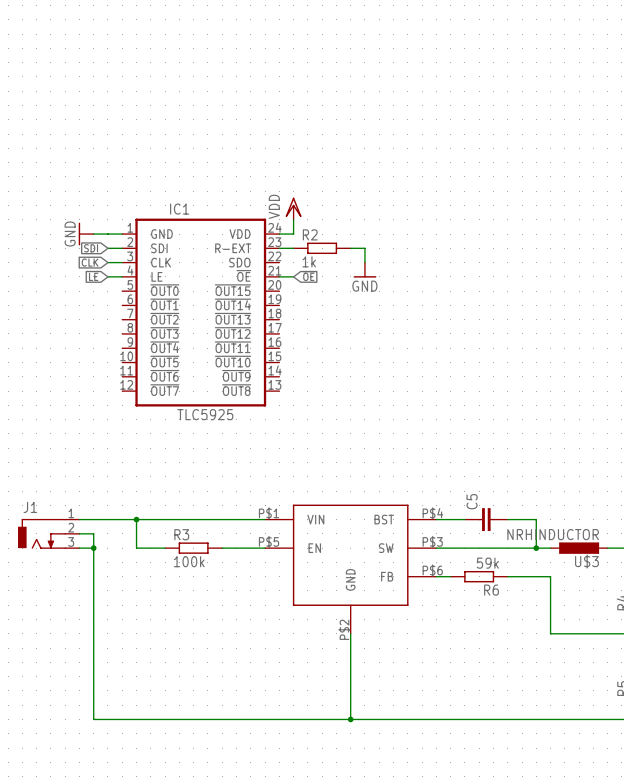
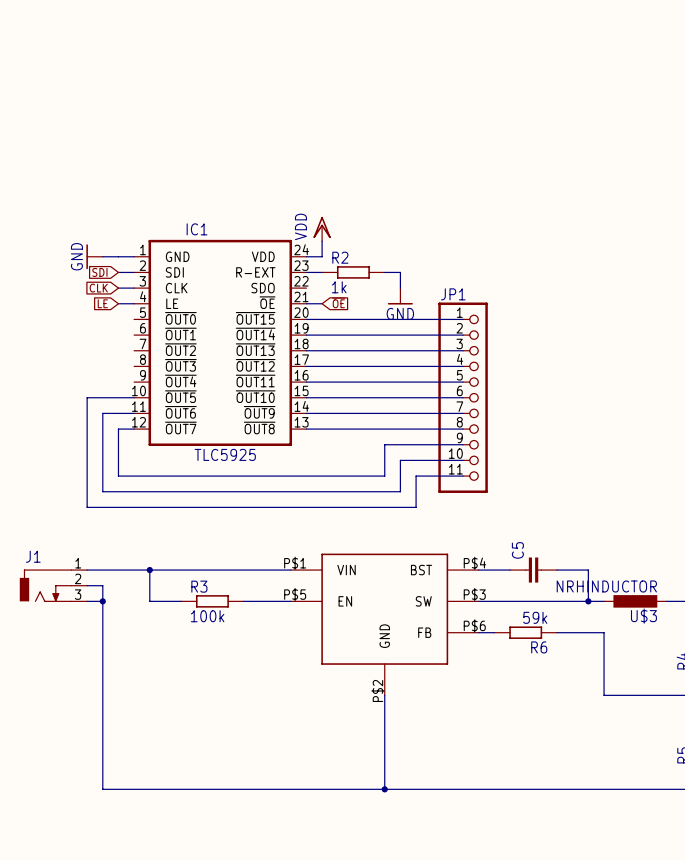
wire: none -> (306, 319) (463, 319)
wire: none -> (306, 335) (463, 335)
wire: none -> (306, 350) (463, 350)
wire: none -> (306, 366) (463, 366)
wire: none -> (306, 382) (463, 382)
wire: none -> (134, 397) (87, 397) (87, 507) (416, 507) (416, 476) (463, 476)
wire: none -> (306, 397) (463, 397)
JP1: none -> (463, 397)
wire: none -> (134, 413) (102, 413) (102, 491) (400, 491) (400, 460) (463, 460)
wire: none -> (306, 413) (463, 413)
wire: none -> (134, 429) (118, 429) (118, 476) (384, 476) (384, 444) (463, 444)
wire: none -> (306, 429) (463, 429)

